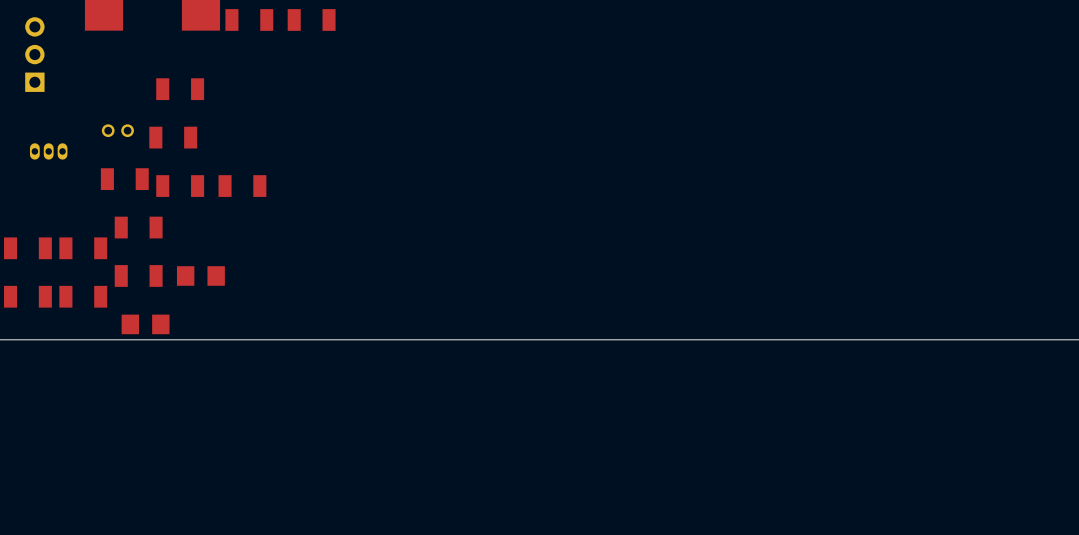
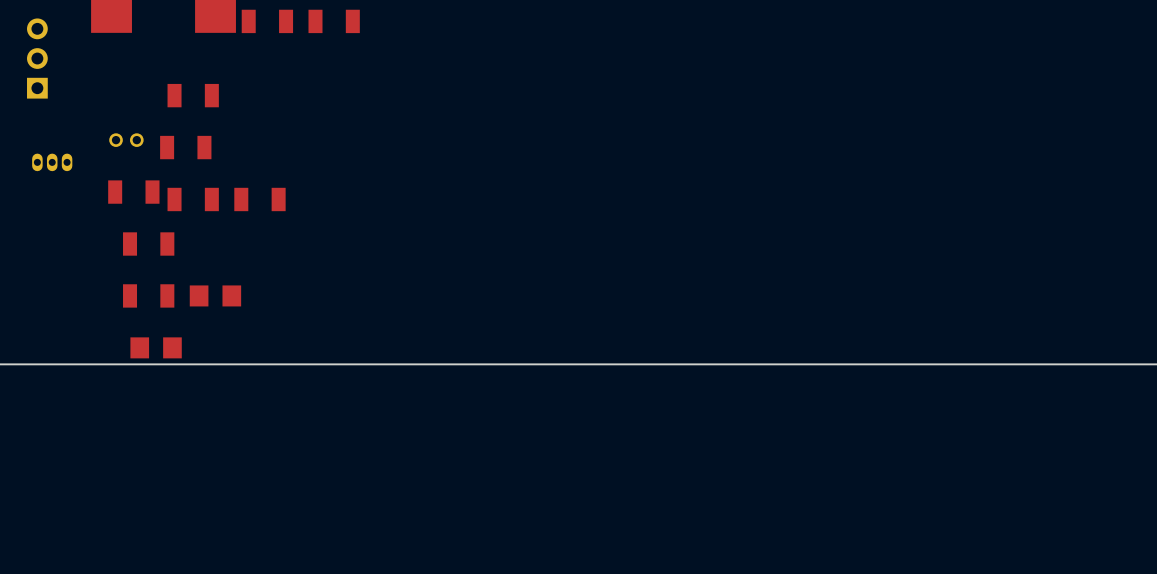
part: (27, 248) -> none
part: (83, 248) -> none
part: (27, 296) -> none
part: (83, 296) -> none

